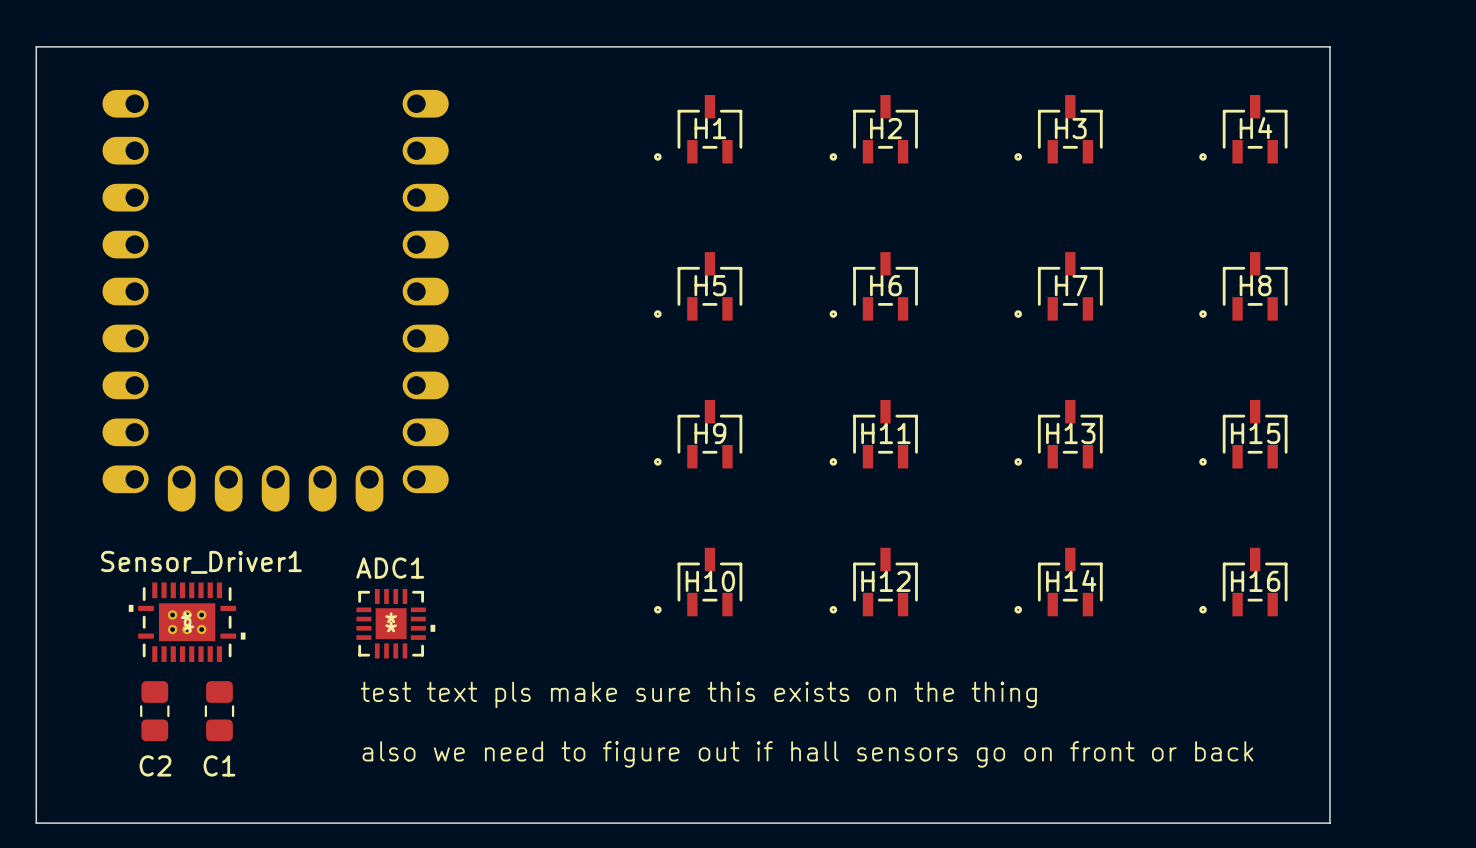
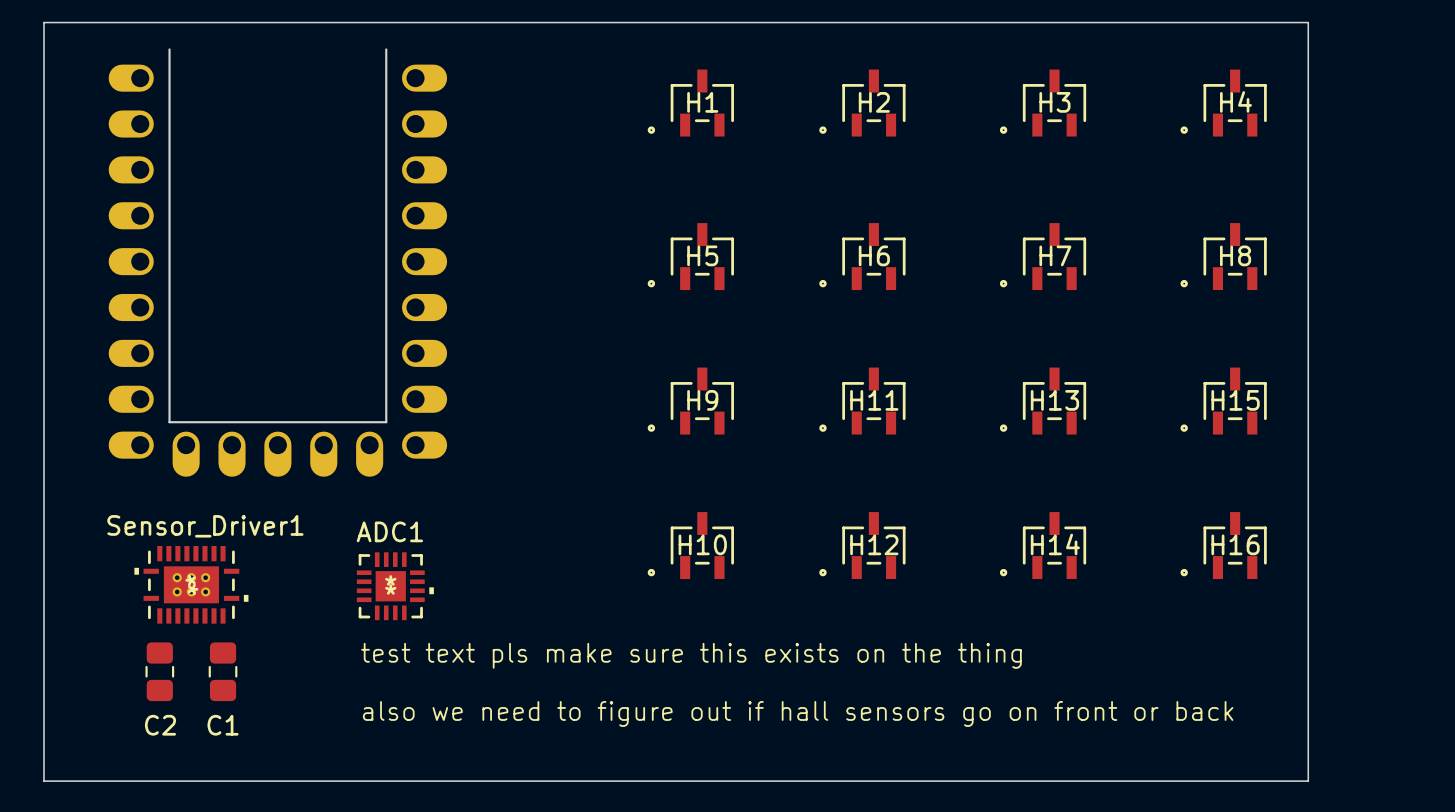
part footprint: [102, 89, 449, 512] -> [108, 48, 448, 477]

